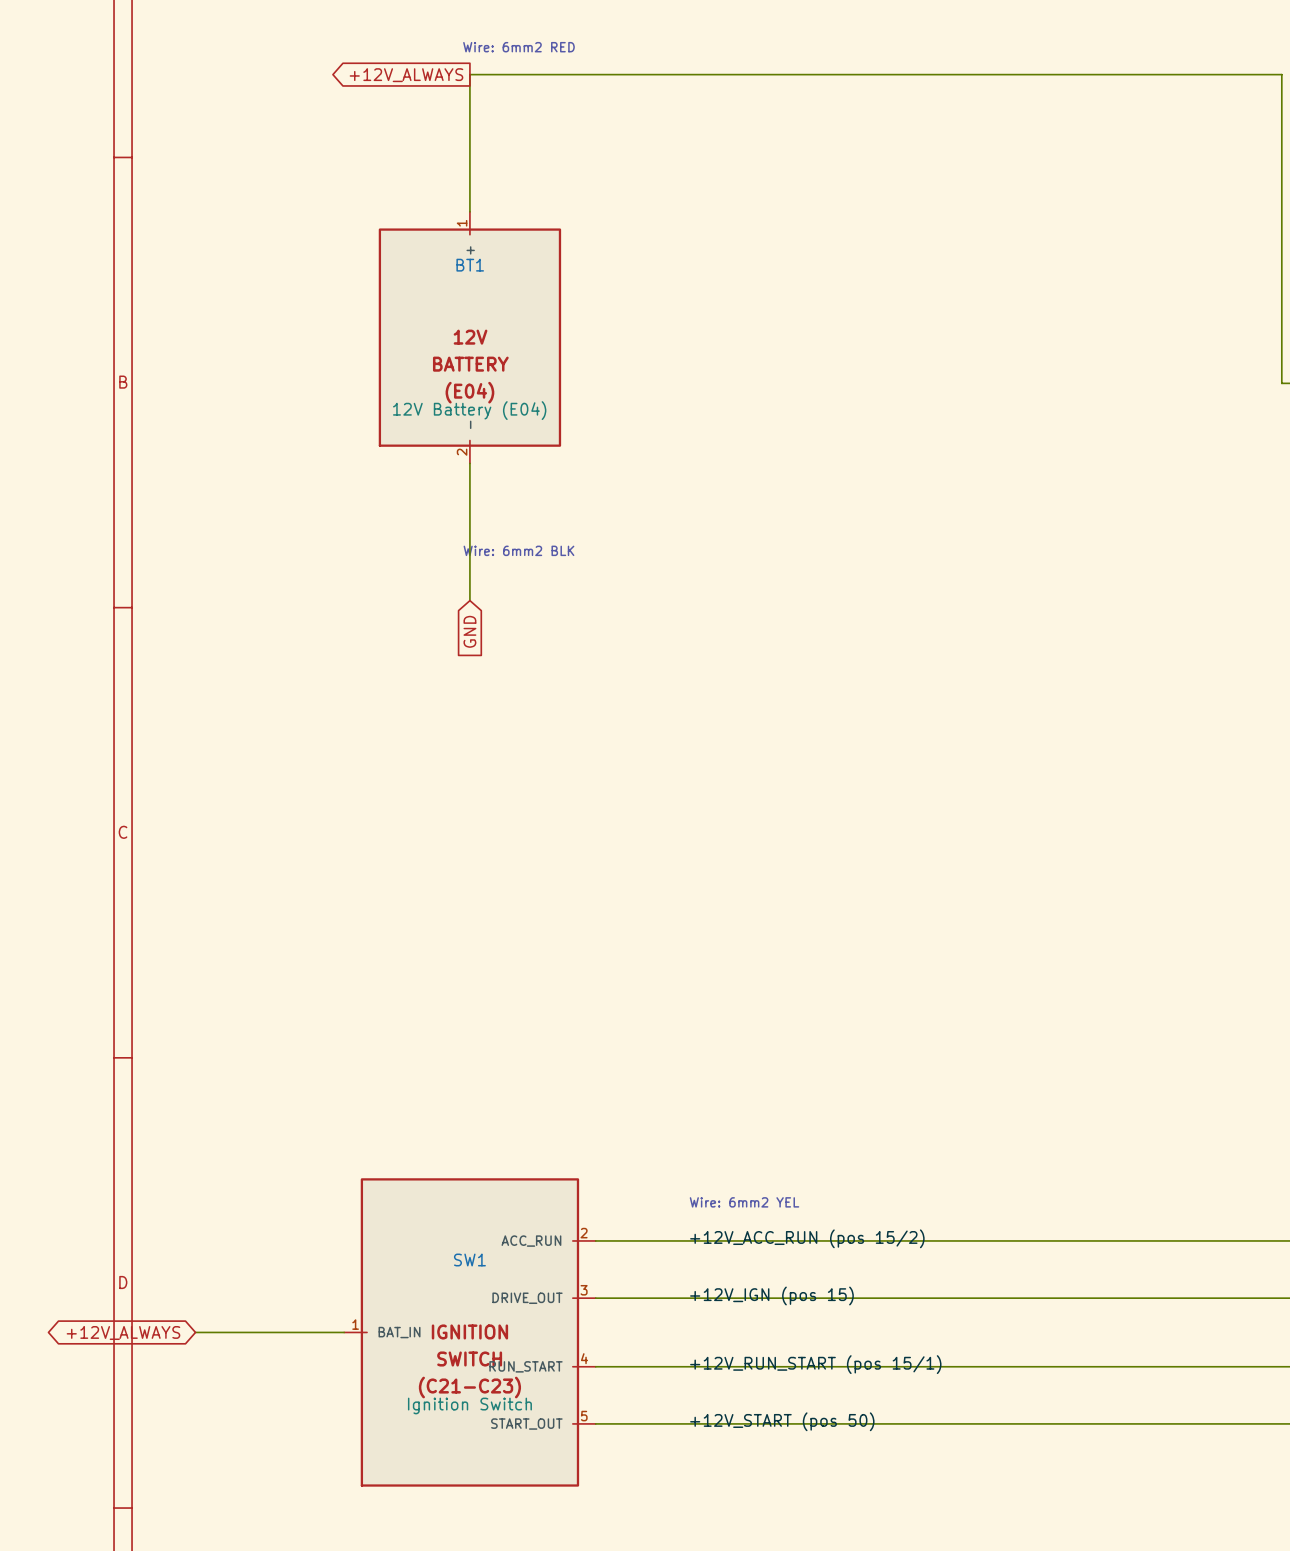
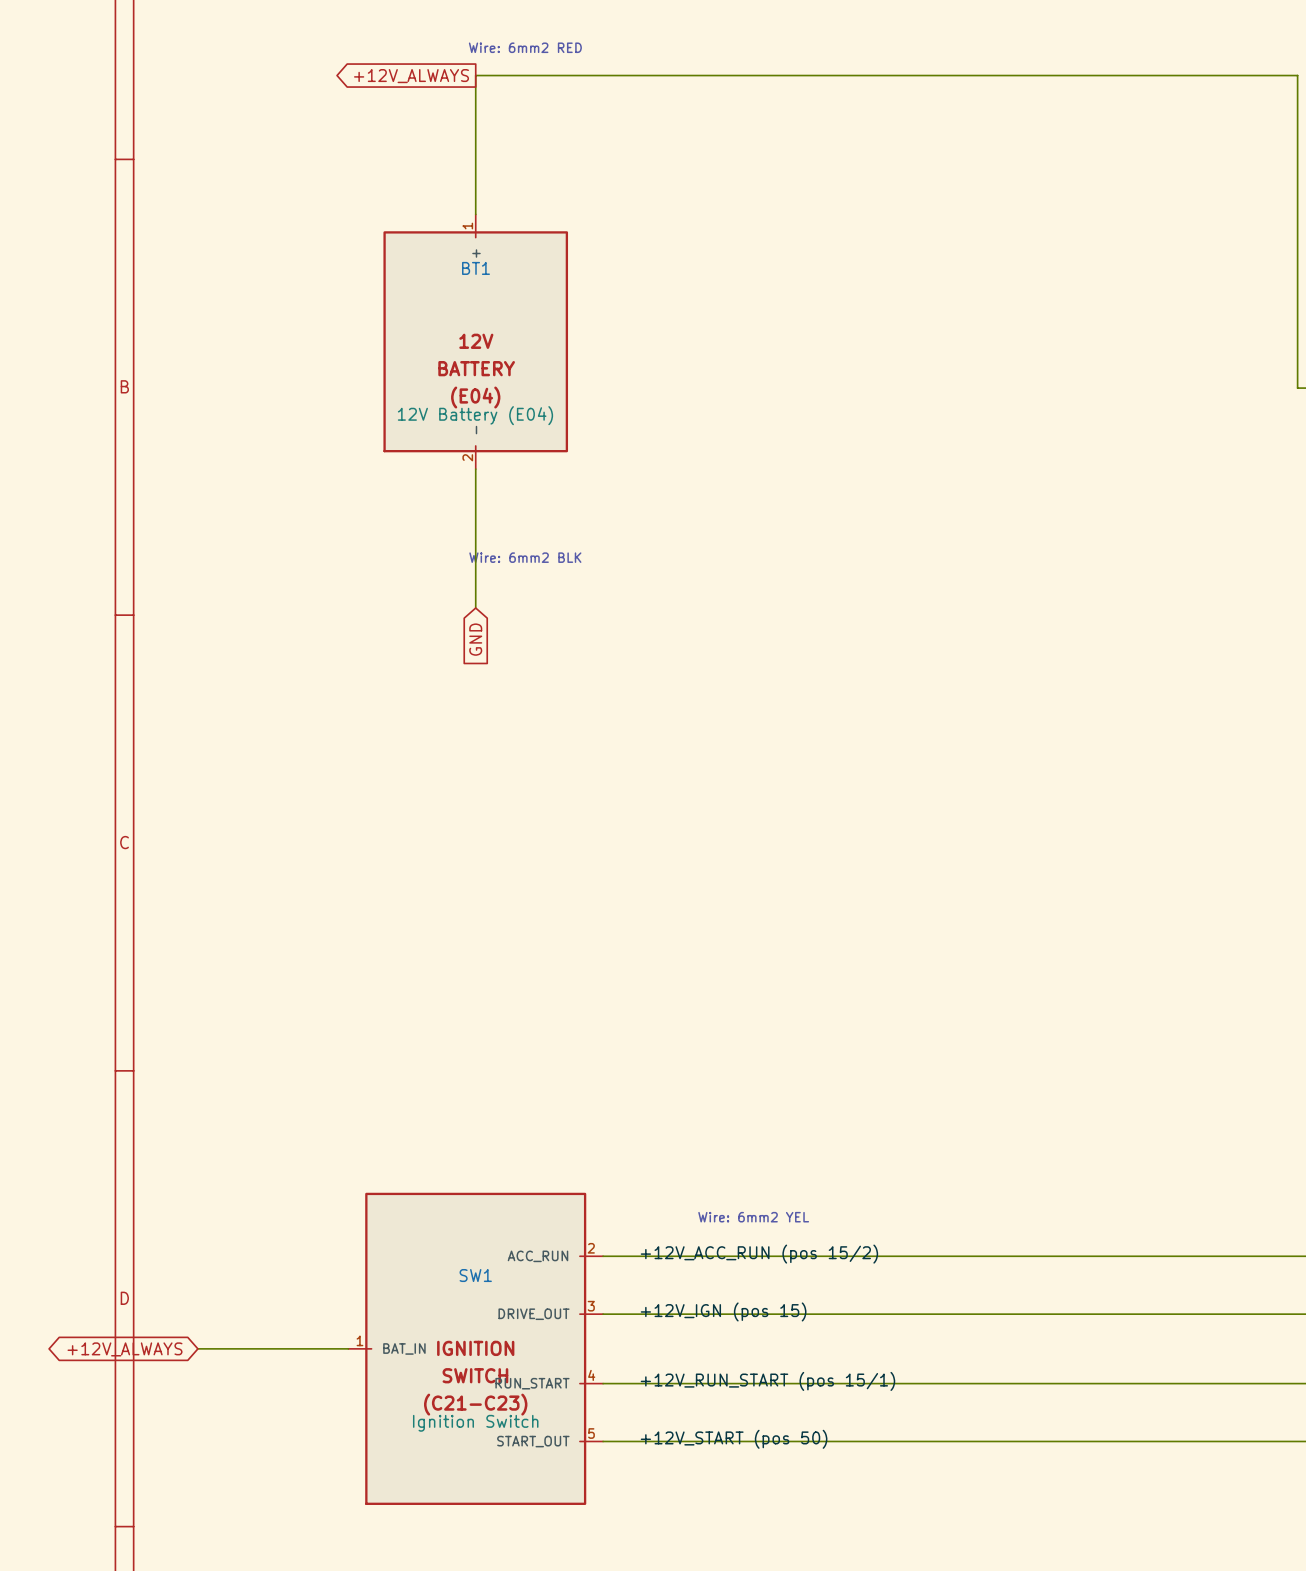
label position: +12V_ACC_RUN (pos 15/2) (807, 1238) -> +12V_ACC_RUN (pos 15/2) (759, 1254)
label position: +12V_IGN (pos 15) (771, 1296) -> +12V_IGN (pos 15) (723, 1311)
label position: +12V_RUN_START (pos 15/1) (815, 1364) -> +12V_RUN_START (pos 15/1) (767, 1381)
label position: +12V_START (pos 50) (782, 1421) -> +12V_START (pos 50) (734, 1439)

